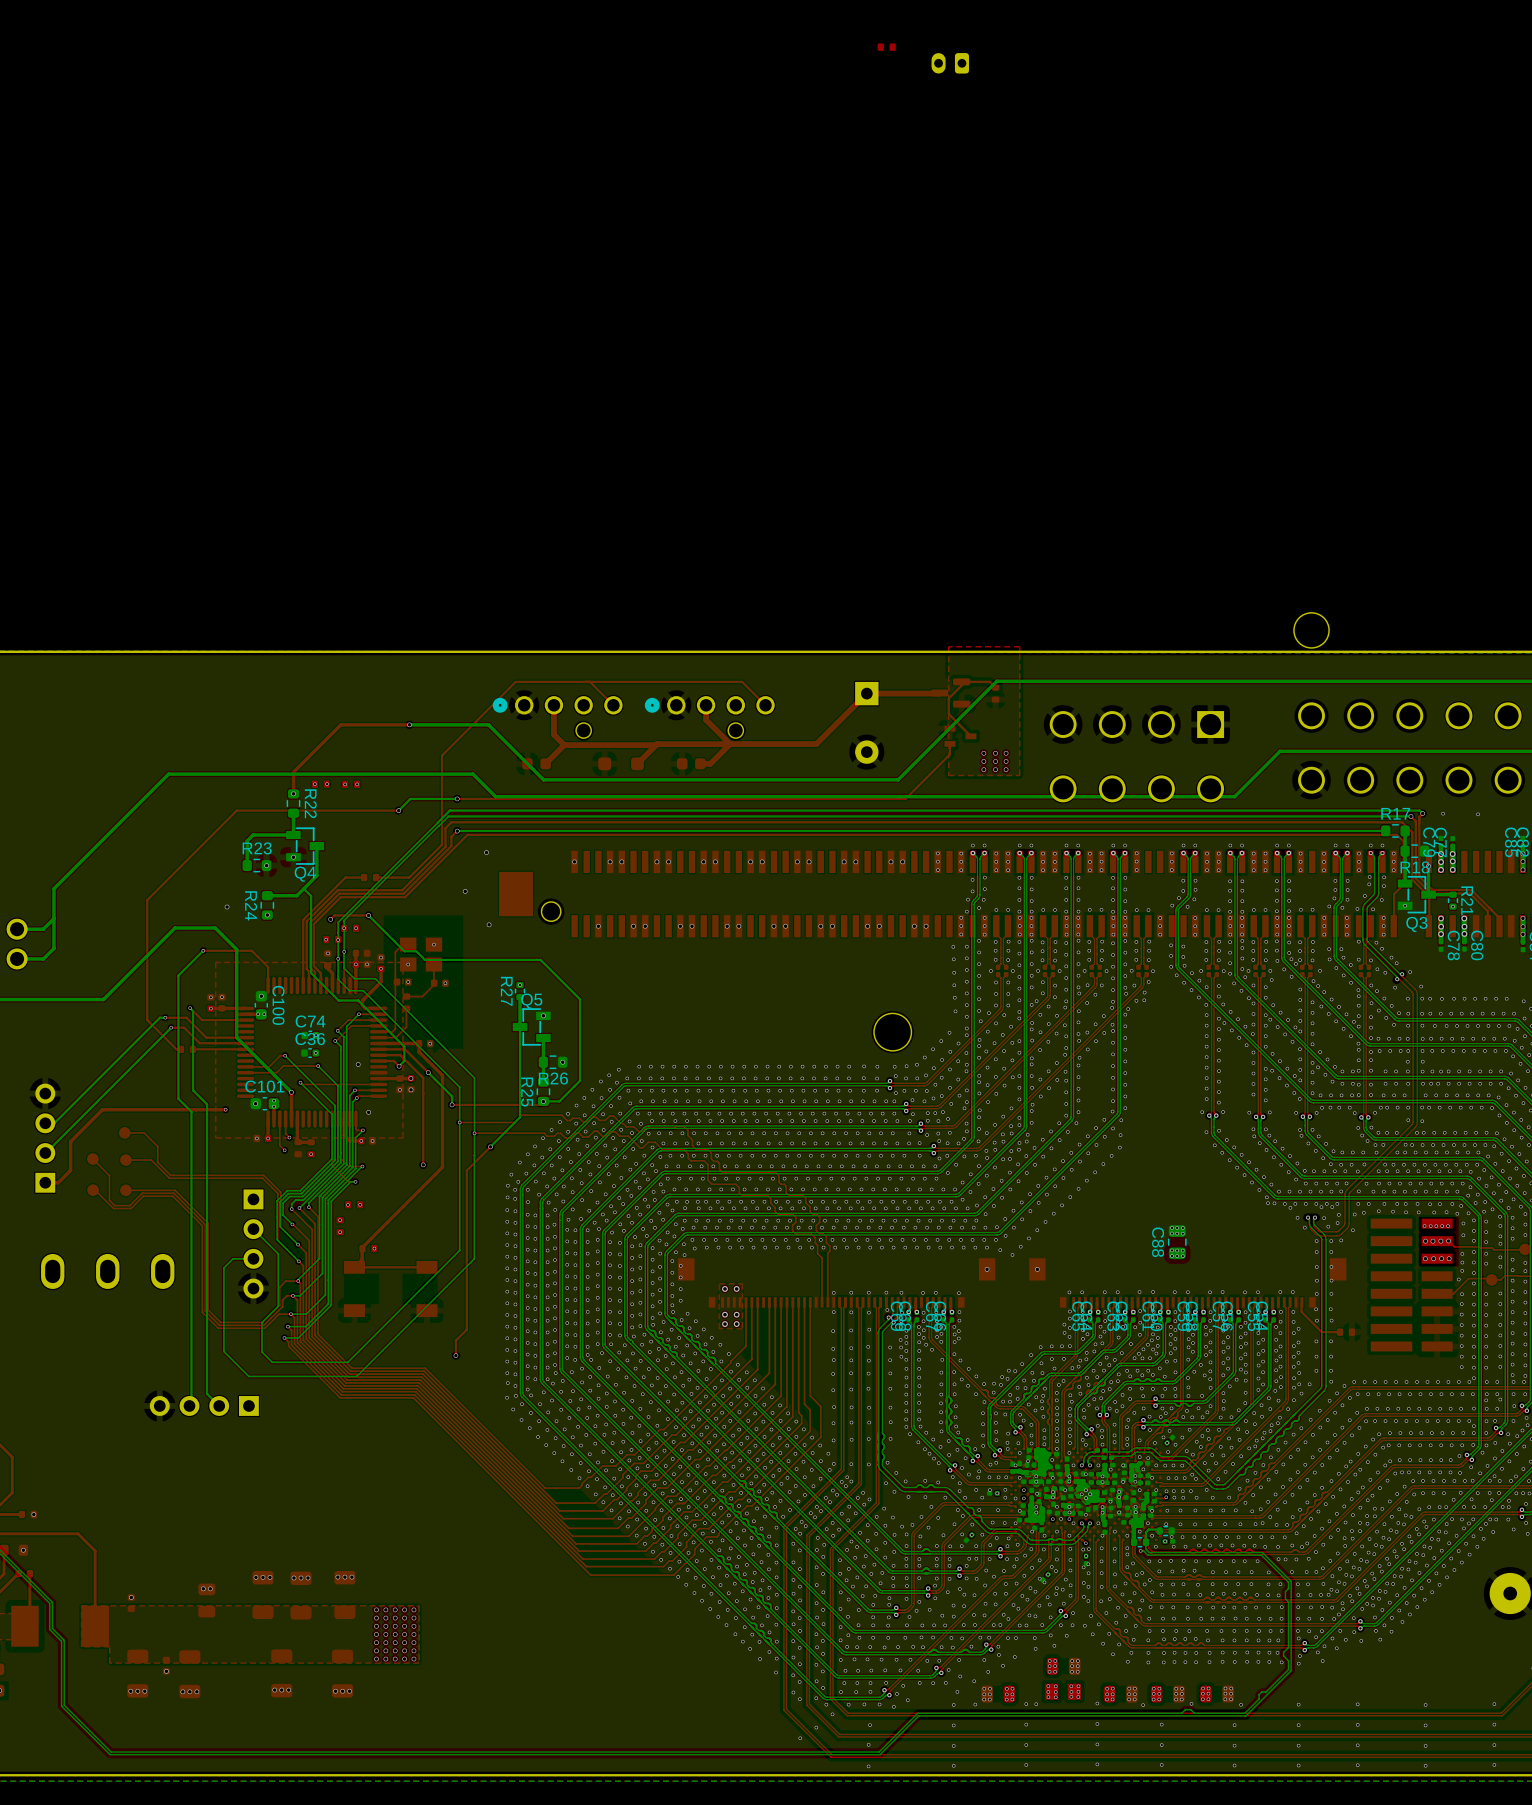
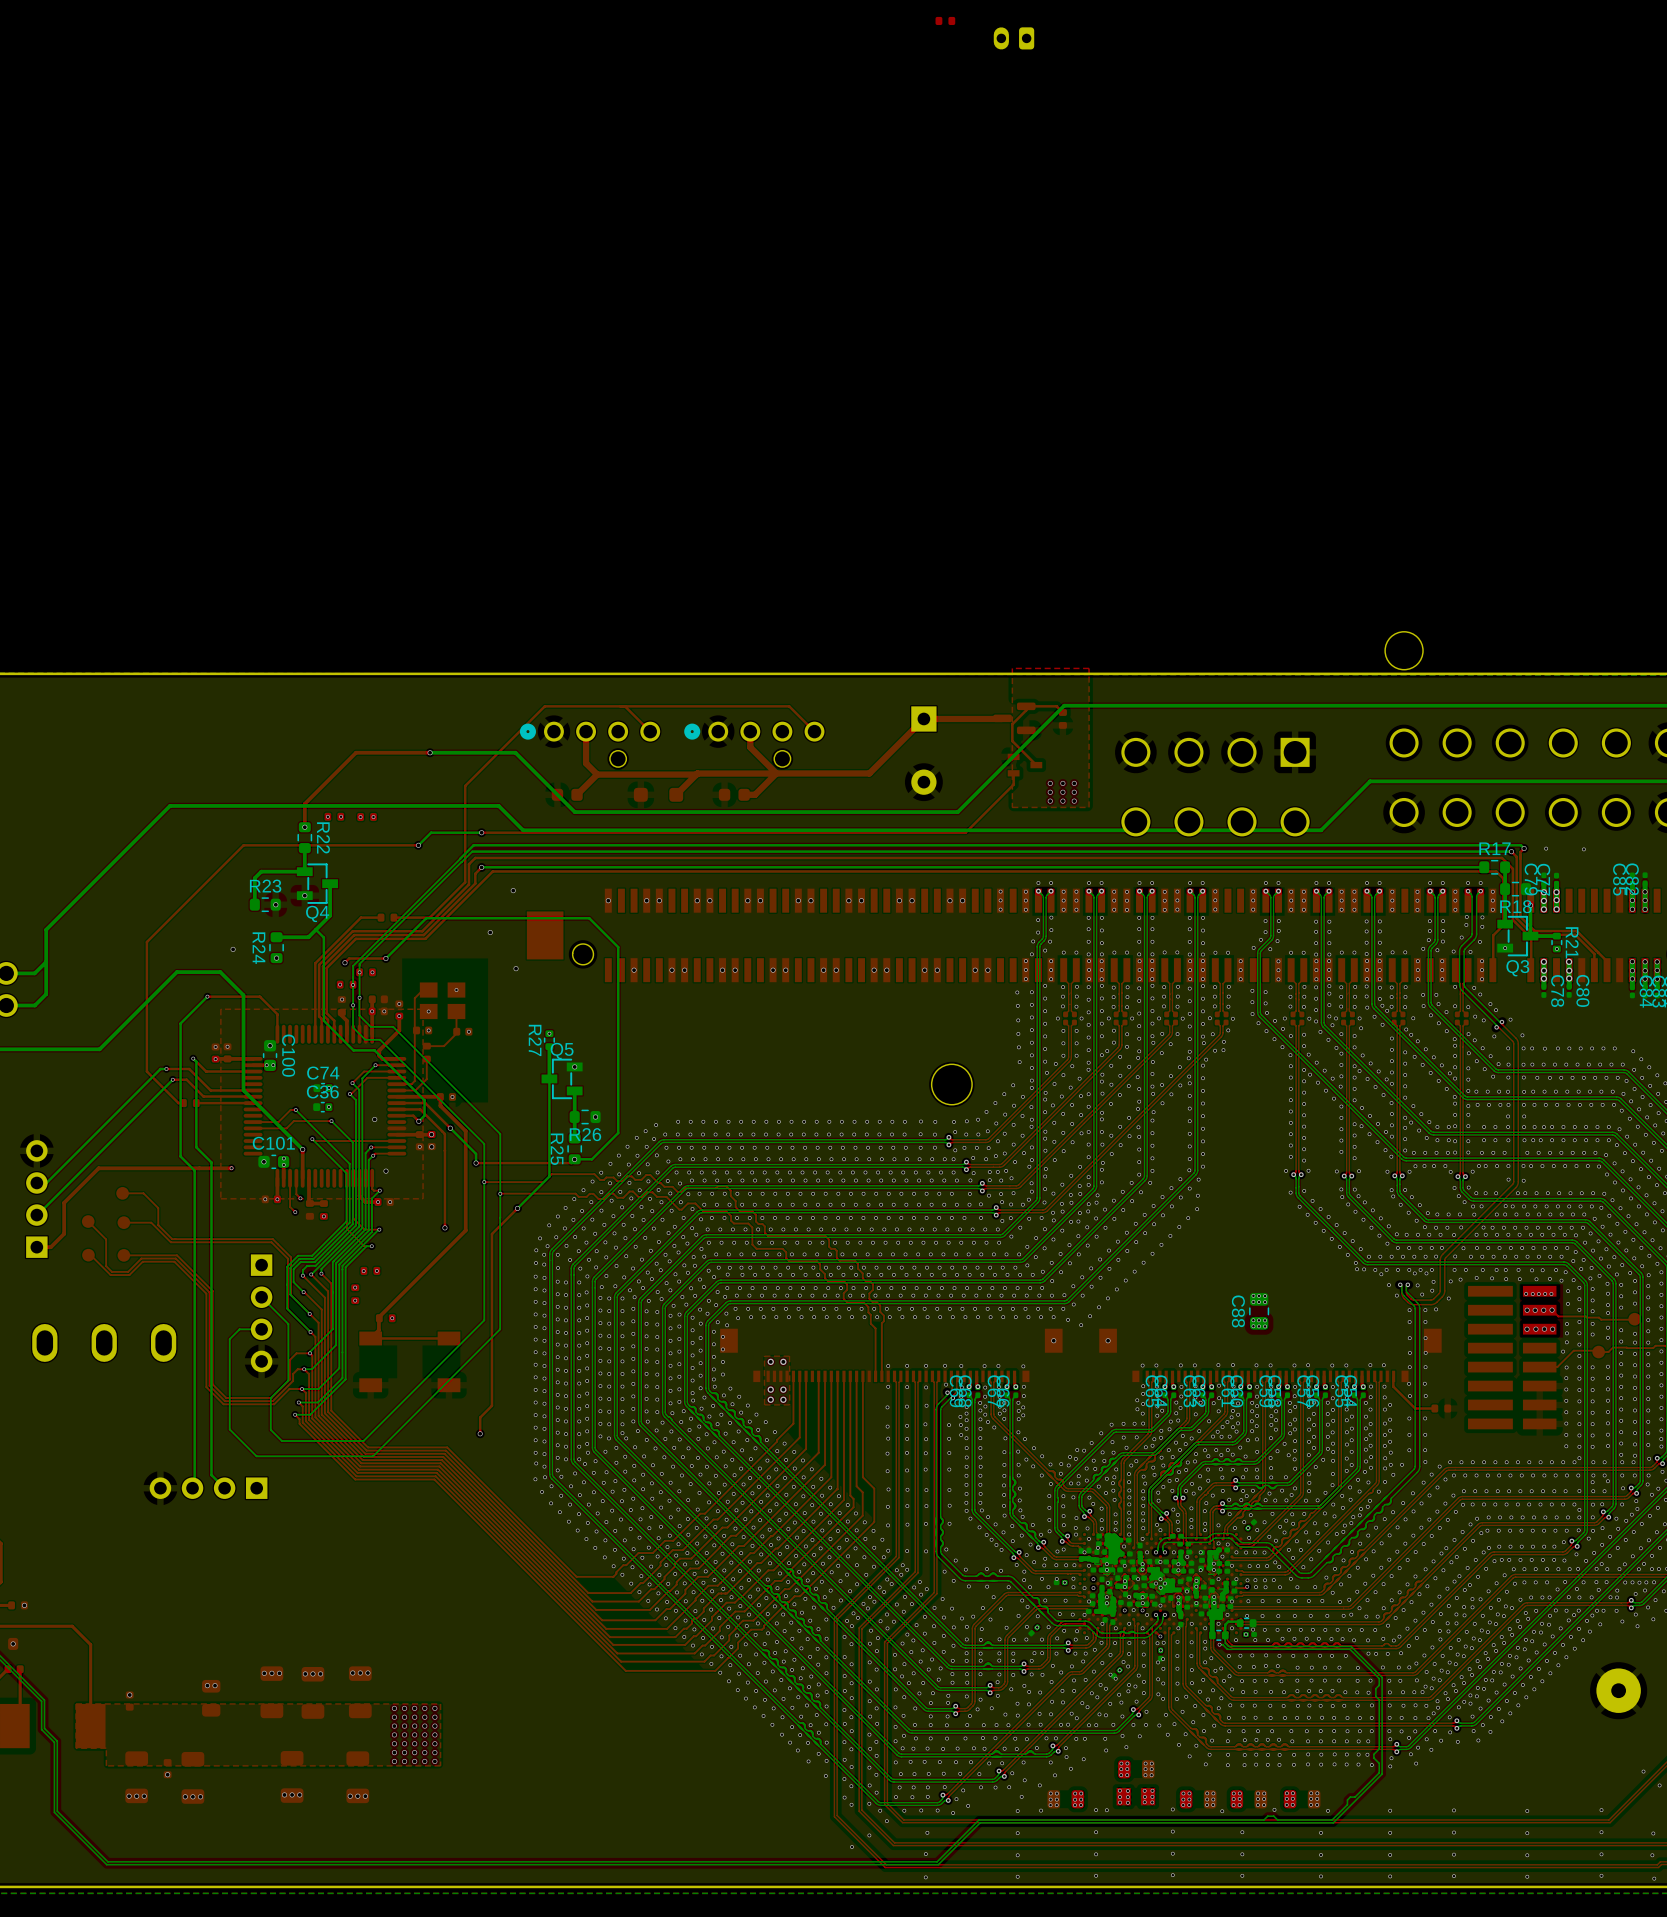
bottom track: (368, 915) (404, 951) (416, 951) (424, 959) (540, 959) (580, 999) (580, 1080) -> (385, 958) (426, 918) (589, 918) (618, 947) (618, 1133) (614, 1137)

